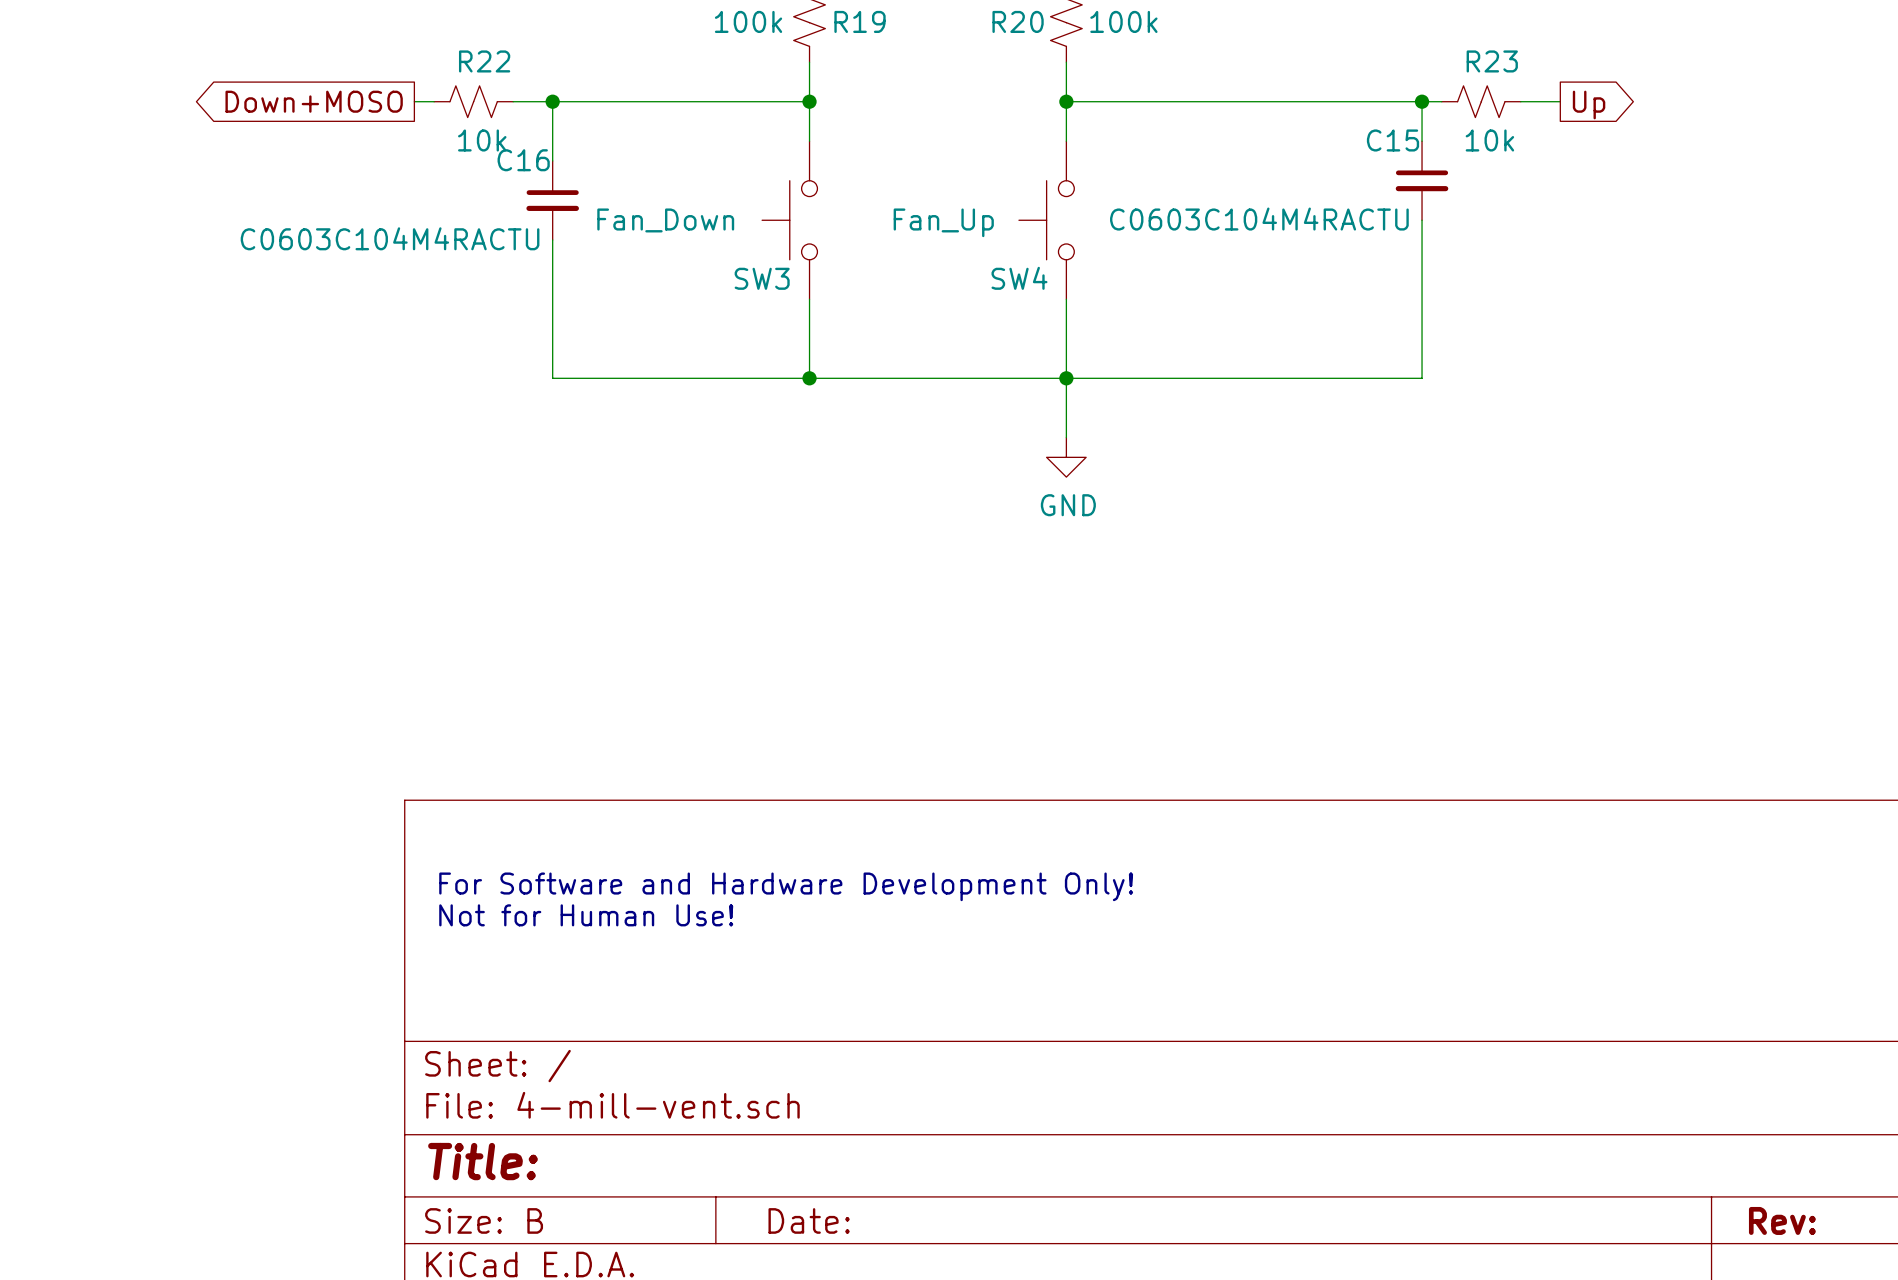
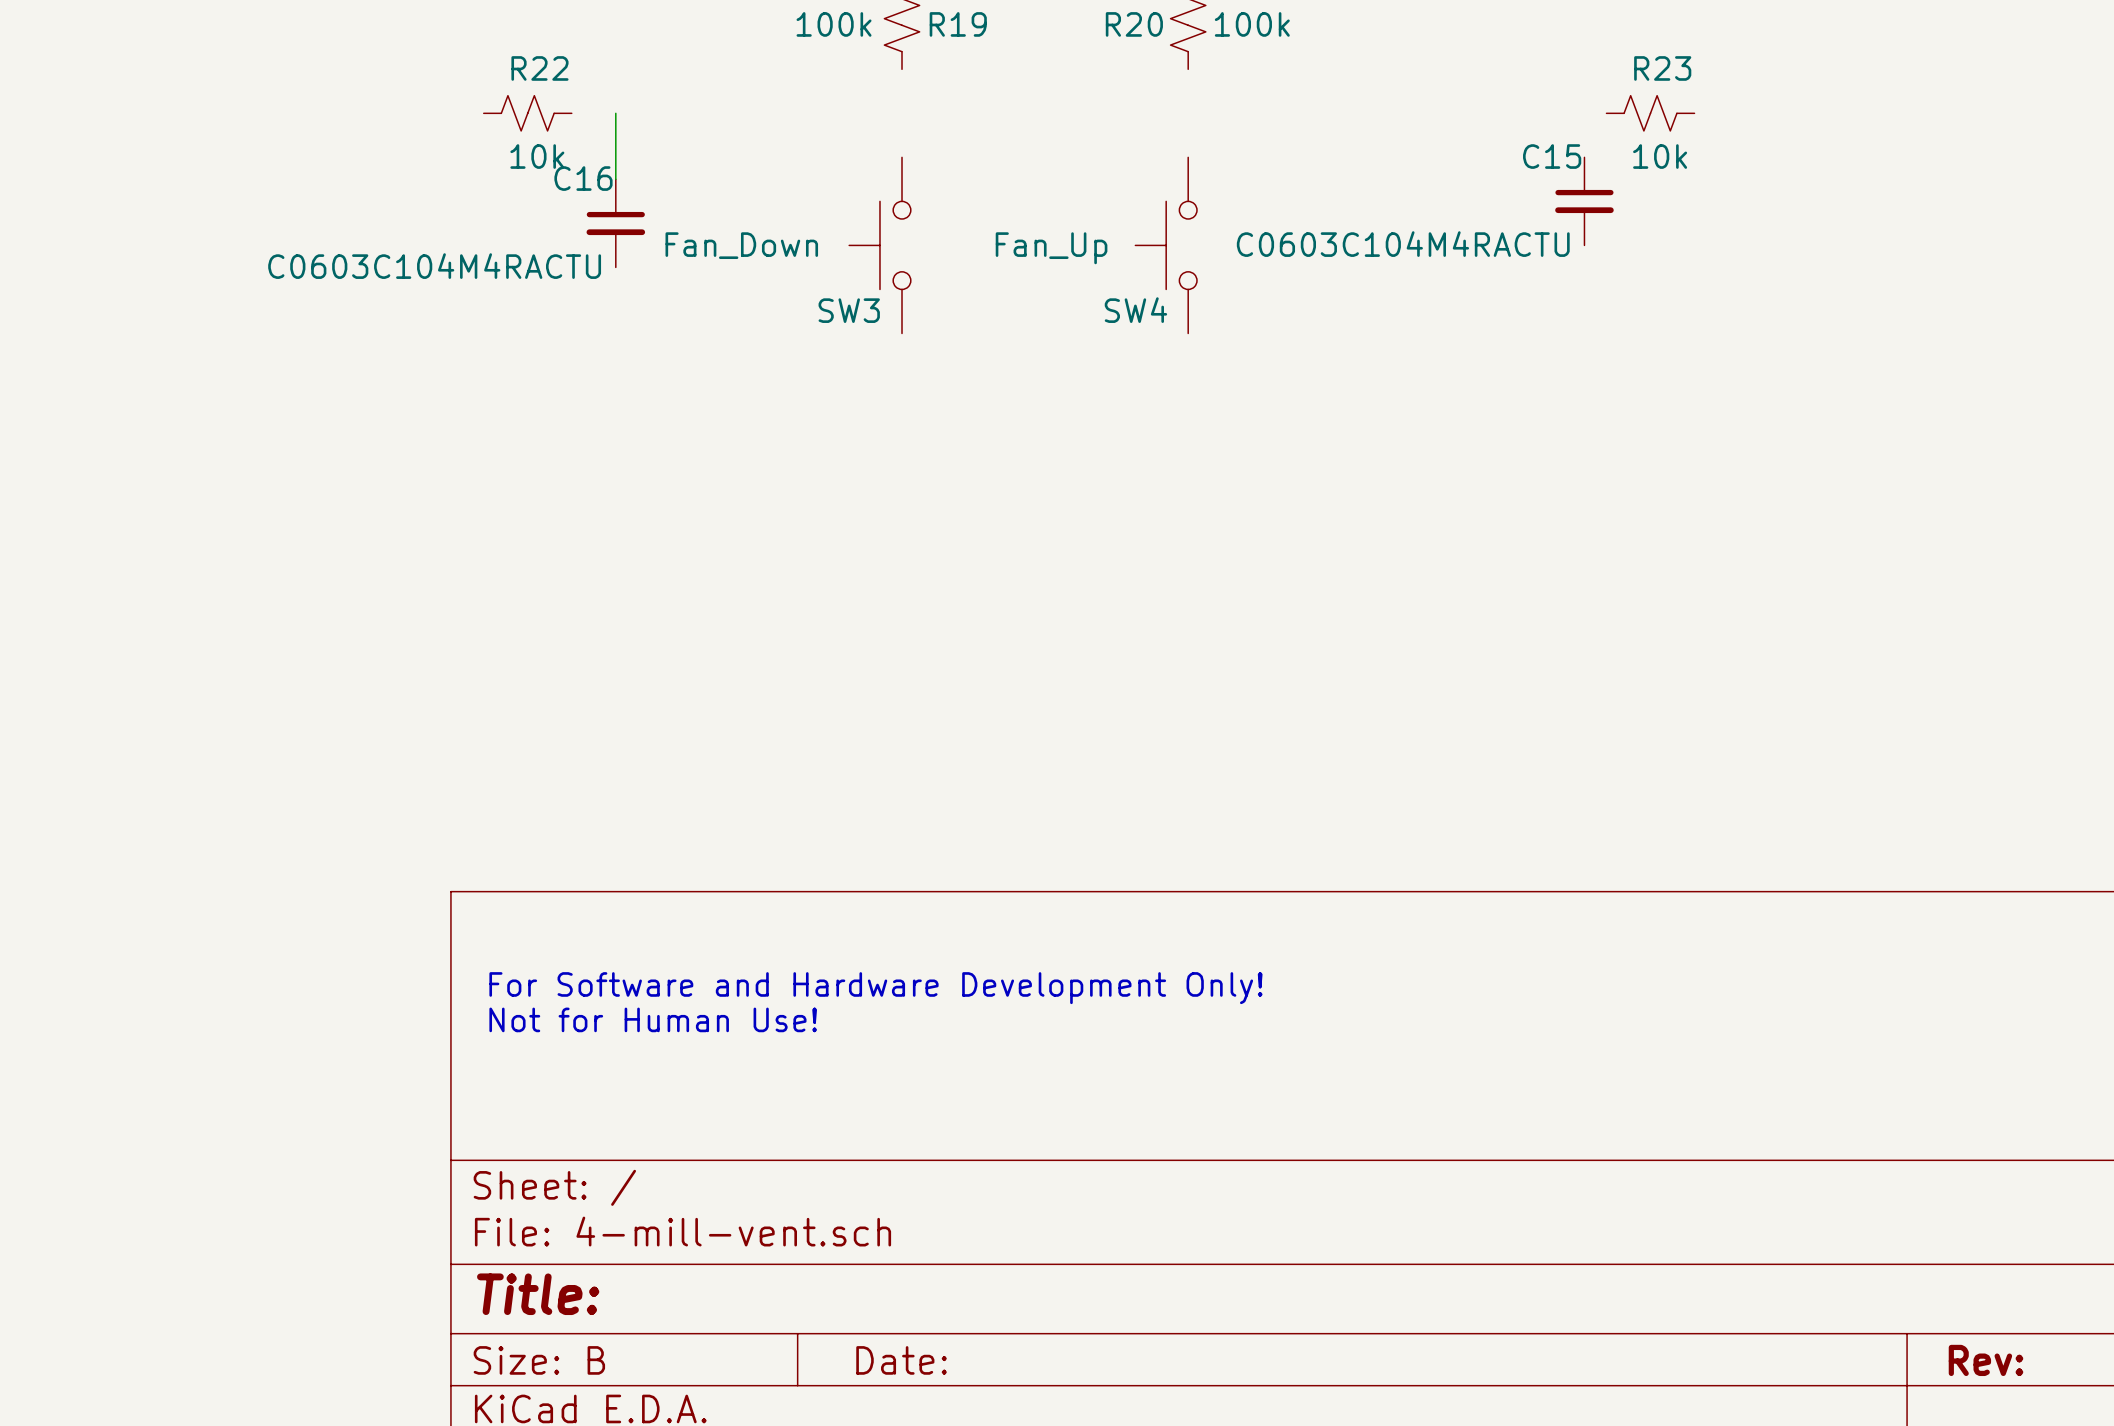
wire: (809, 62) (809, 141) -> none
wire: (1066, 62) (1066, 141) -> none
global label: Down+MOSO (314, 101) -> none
wire: (414, 101) (434, 101) -> none
wire: (513, 101) (809, 101) -> none
junction: (552, 101) -> none
junction: (809, 101) -> none
wire: (1066, 101) (1441, 101) -> none
junction: (1066, 101) -> none
wire: (1422, 101) (1422, 141) -> none
junction: (1422, 101) -> none
wire: (1520, 101) (1560, 101) -> none
global label: Up (1589, 105) -> none
wire: (1422, 220) (1422, 378) (552, 378) (552, 240) -> none
wire: (809, 299) (809, 378) -> none
wire: (1066, 299) (1066, 437) -> none
junction: (809, 378) -> none
junction: (1066, 378) -> none
power symbol: GND (1066, 457) -> none

